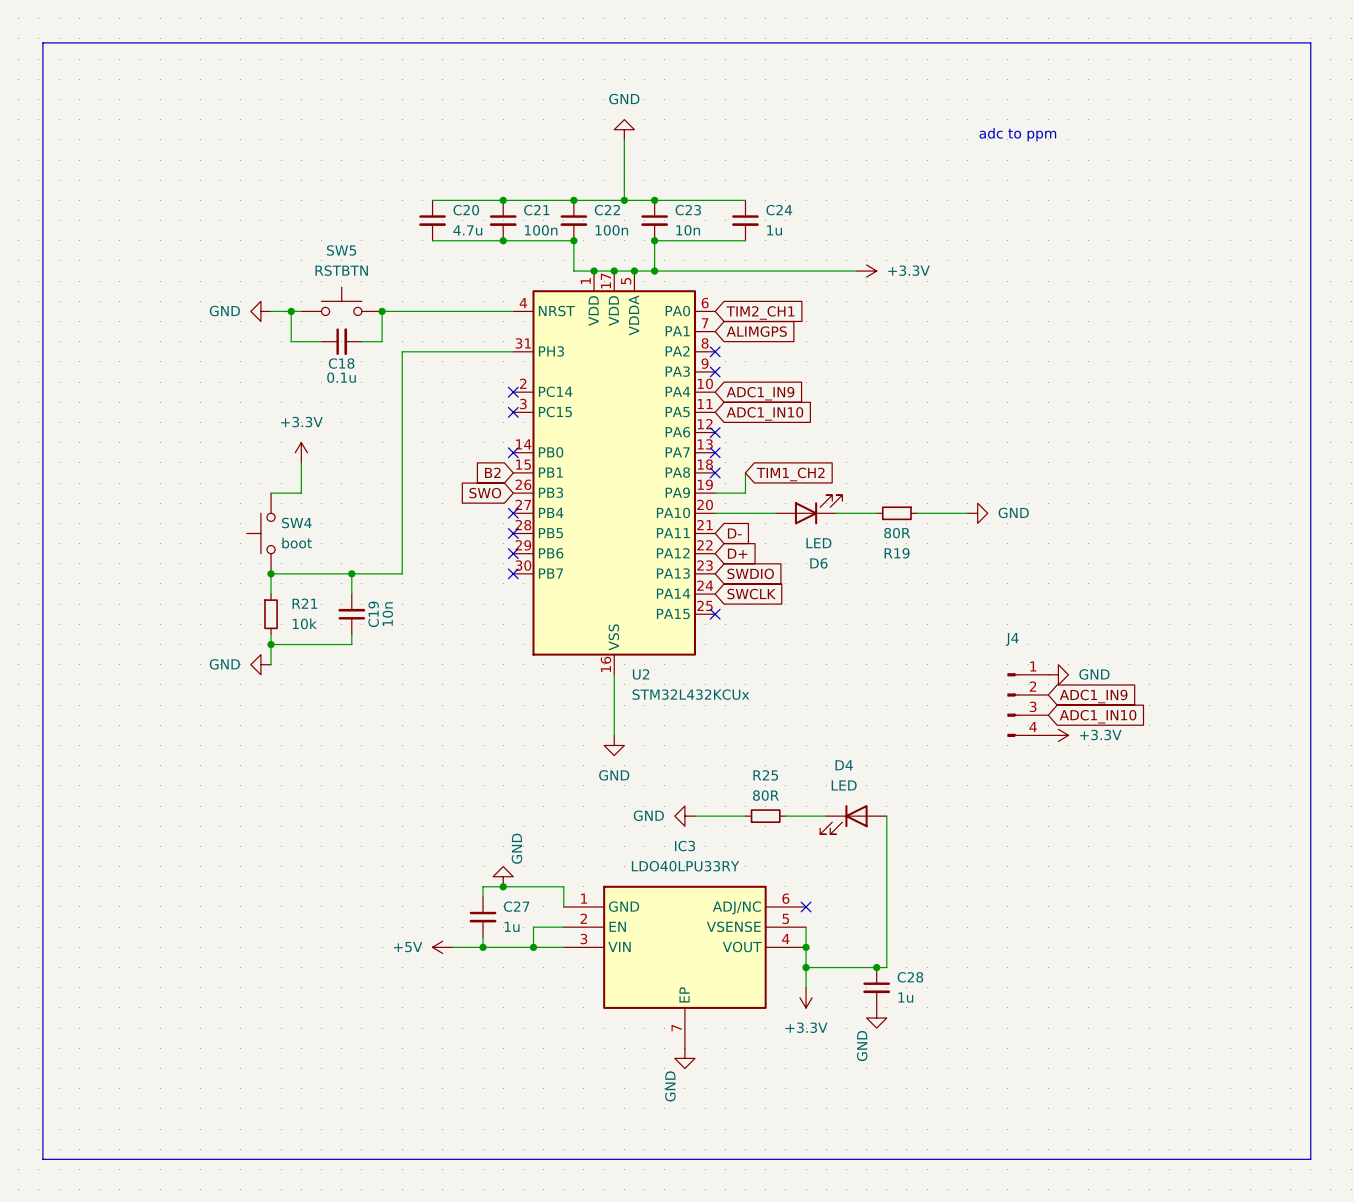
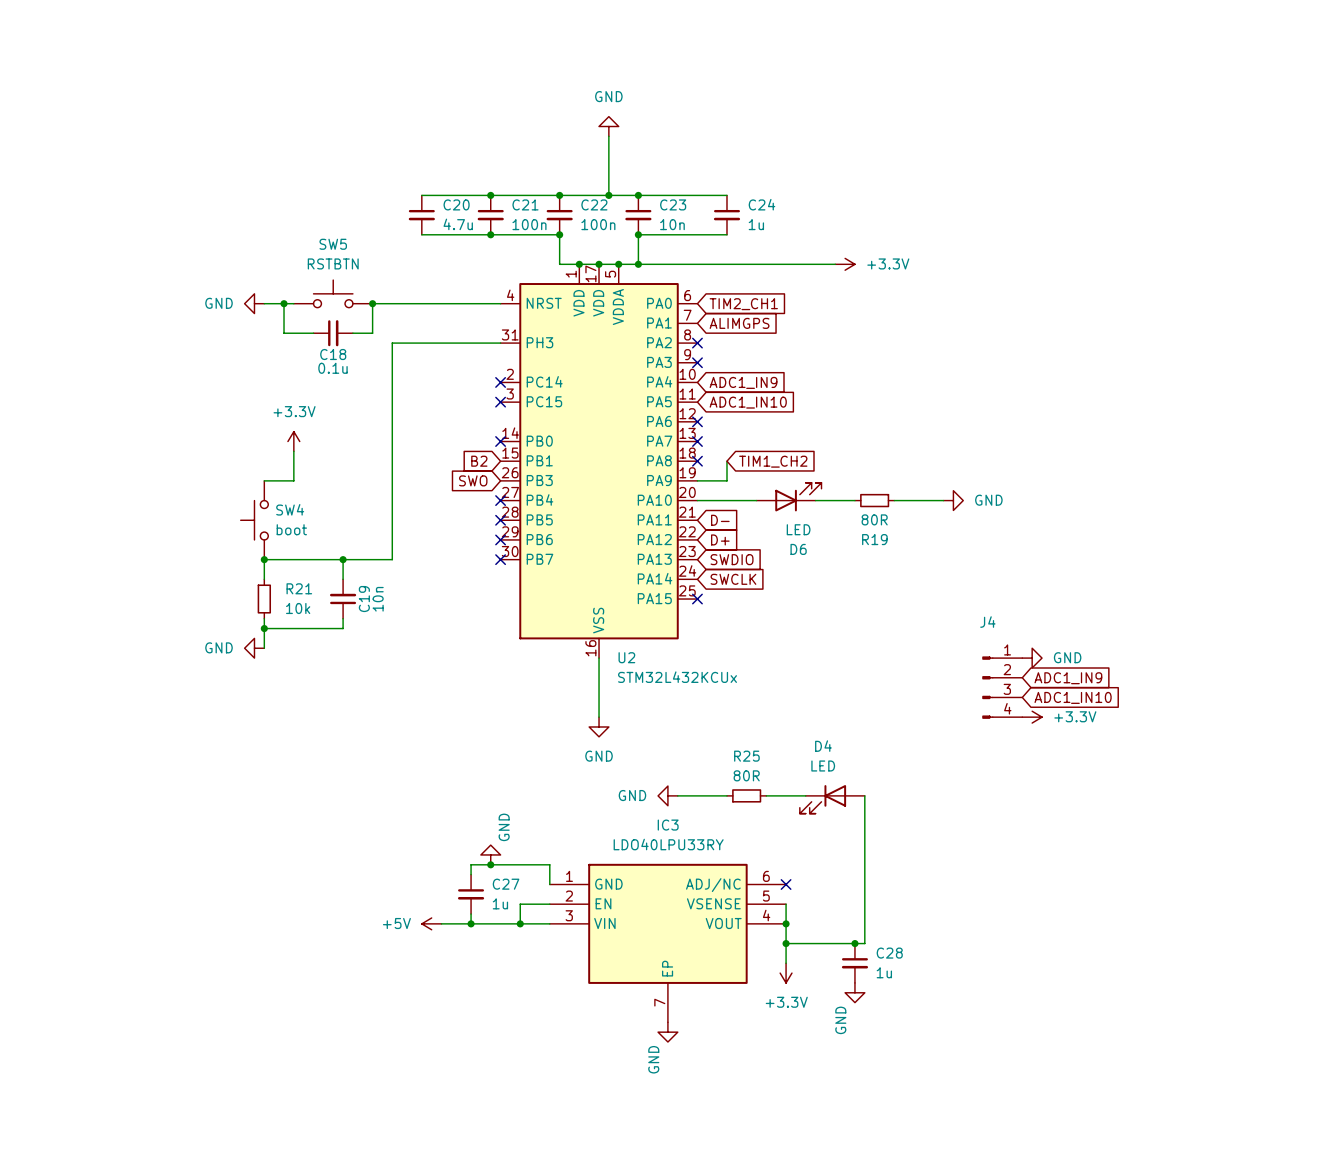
line: (42, 42) (1310, 42) (1310, 1159) (42, 1159) (42, 42) -> none
text: adc to ppm (1017, 134) -> none

